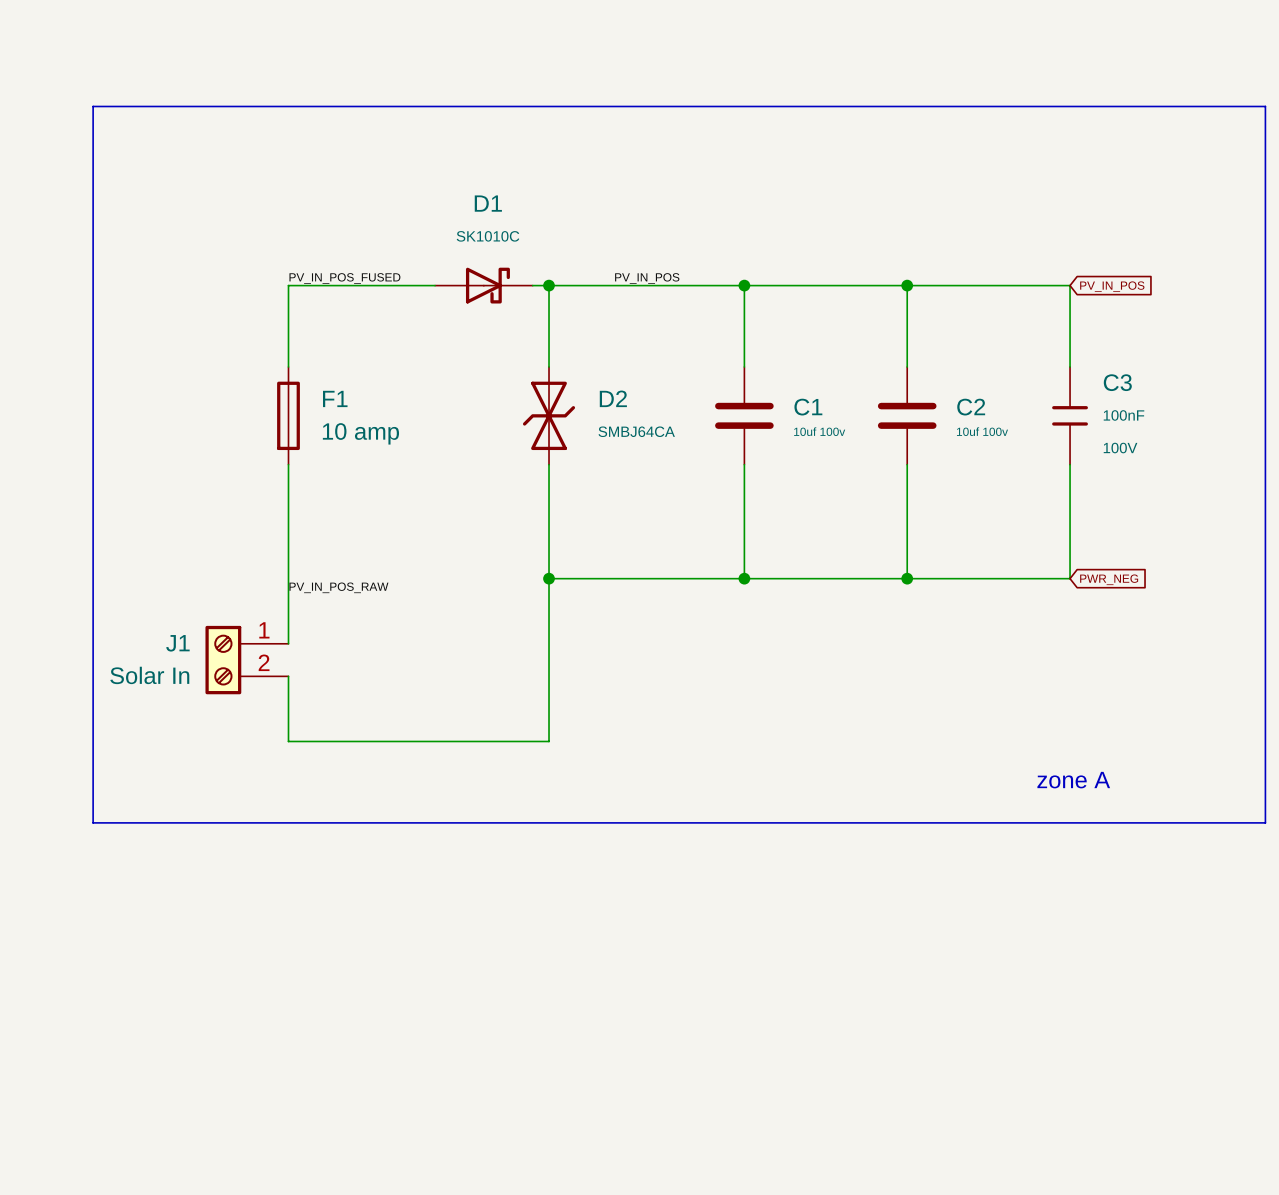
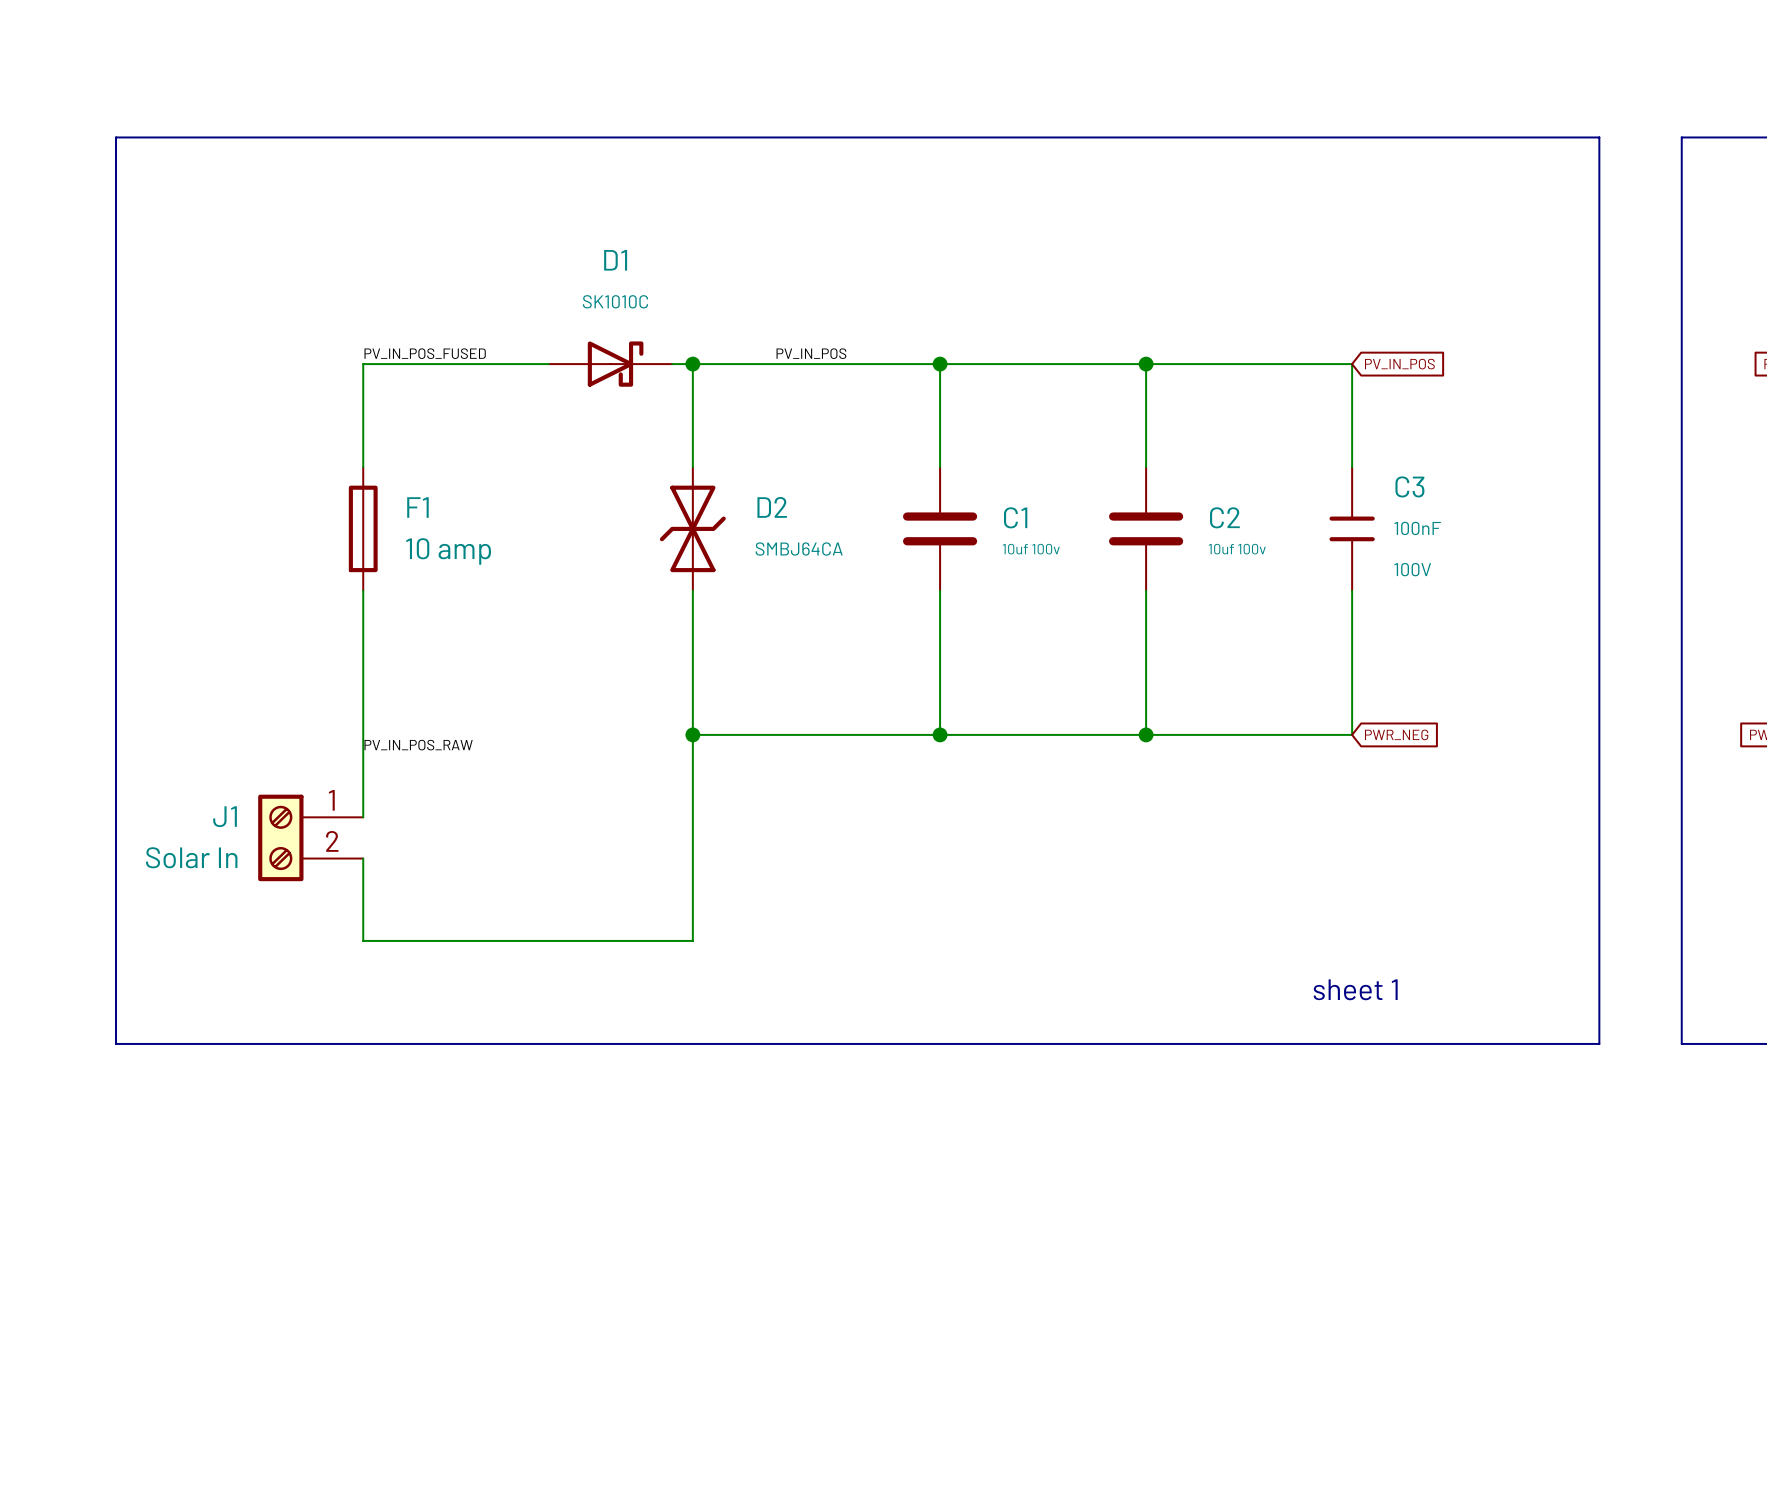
text: zone A (1073, 780) -> sheet 1 (1355, 989)

